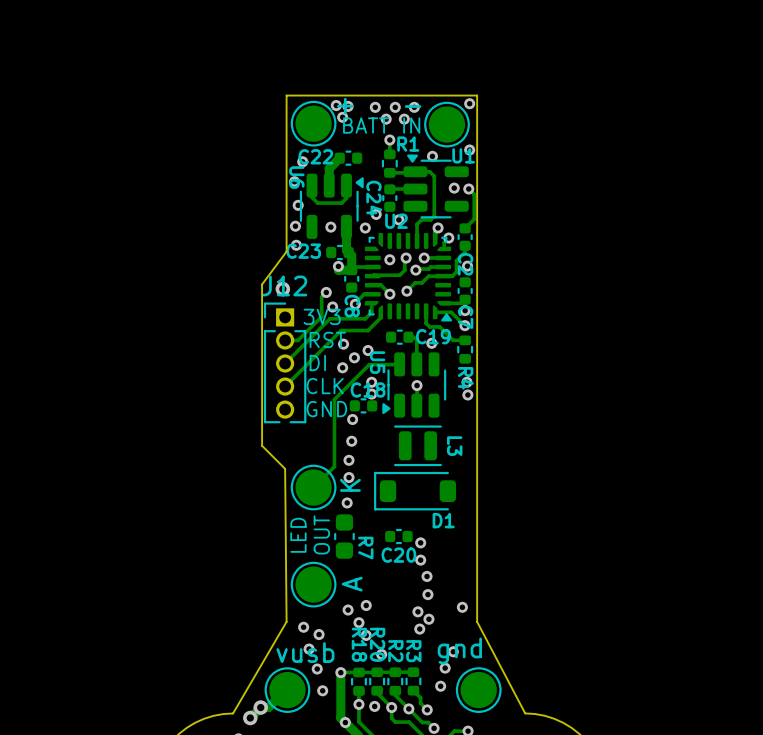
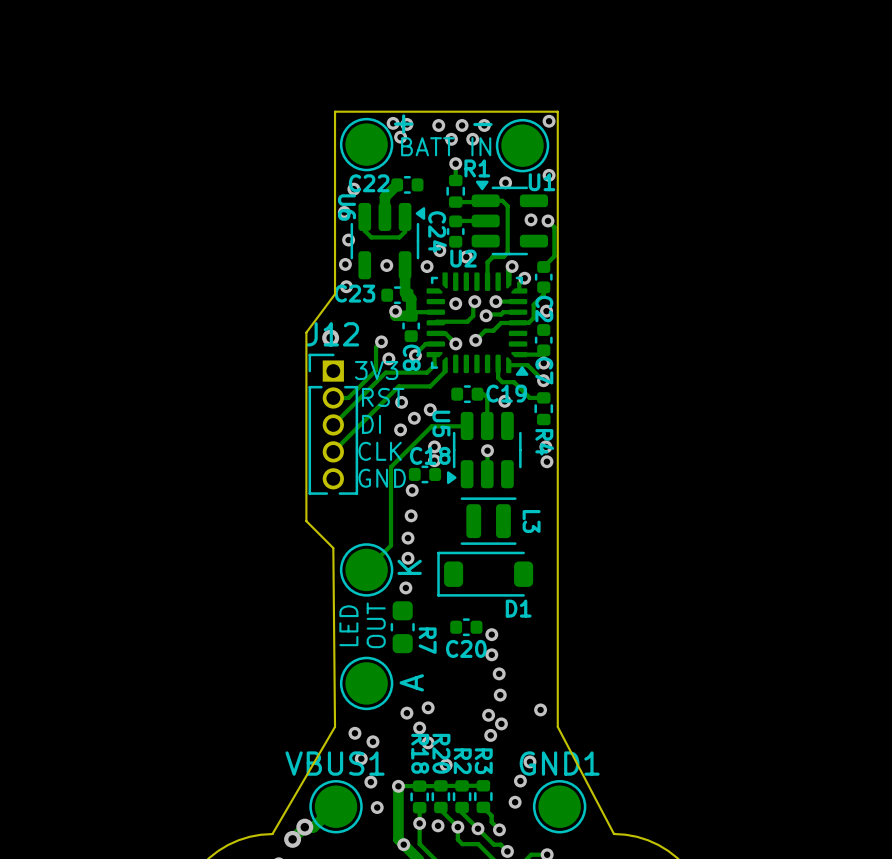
gnd name: gnd (459, 650) -> GND1 (559, 763)
vusb name: vusb (305, 652) -> VBUS1 (335, 763)

